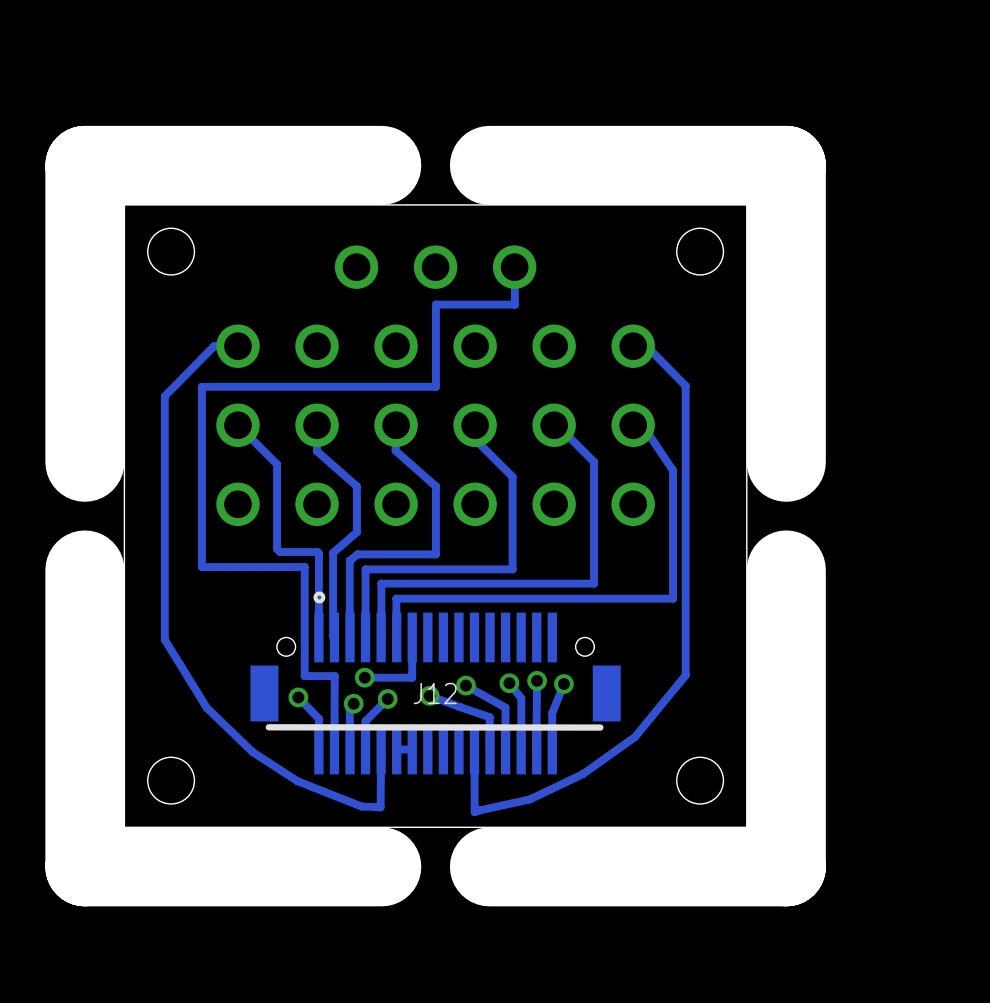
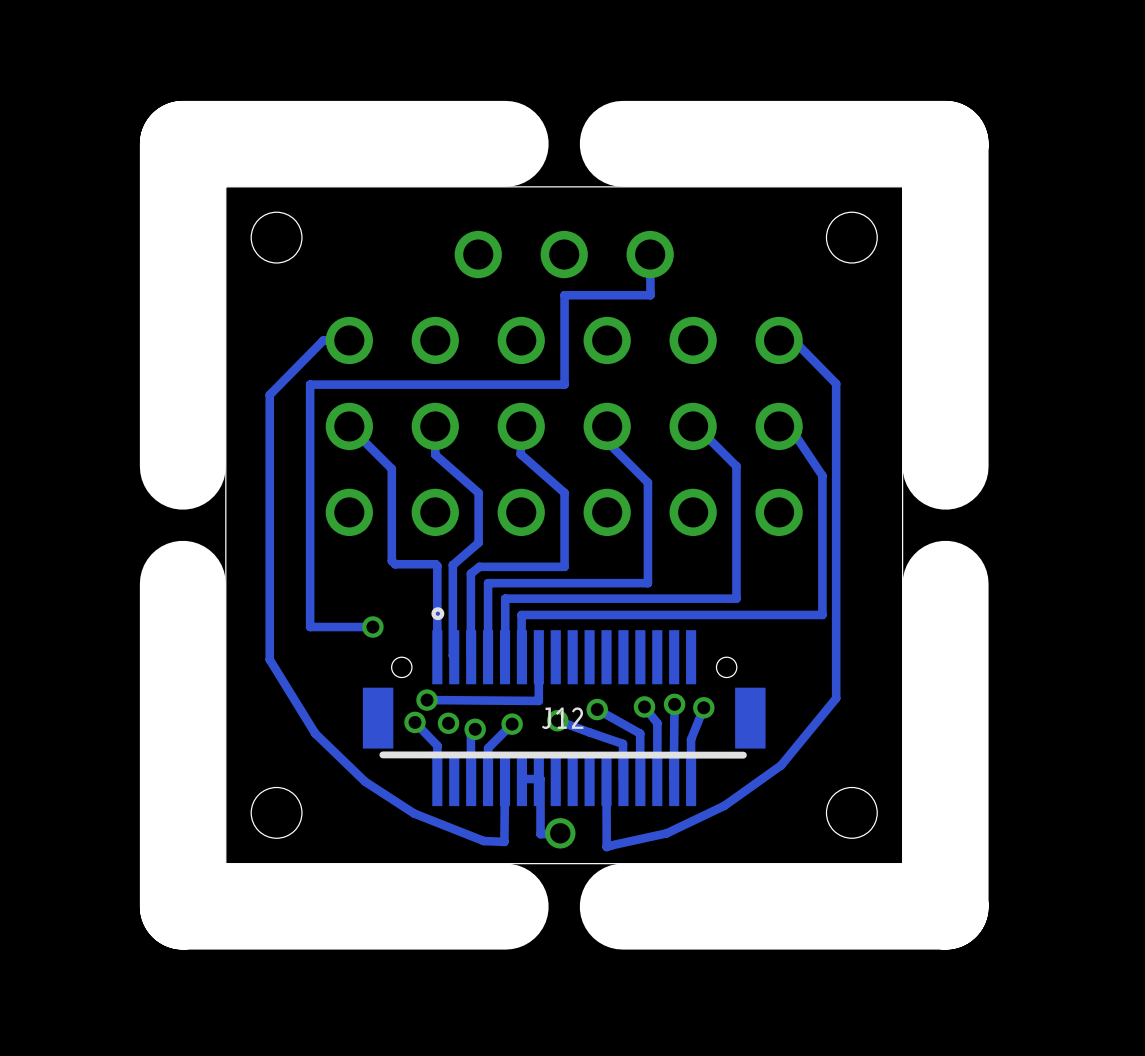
track: (201, 567) (304, 567) (304, 676) (334, 676) (334, 749) -> (310, 580) (310, 627) (372, 627)
via: none -> (372, 627)
via: none -> (427, 700)
via: (364, 677) -> none
track: (412, 677) (364, 677) -> (538, 700) (427, 700)
via: none -> (448, 723)
track: none -> (538, 779) (540, 779) (540, 834) (560, 833)
via: none -> (560, 833)

